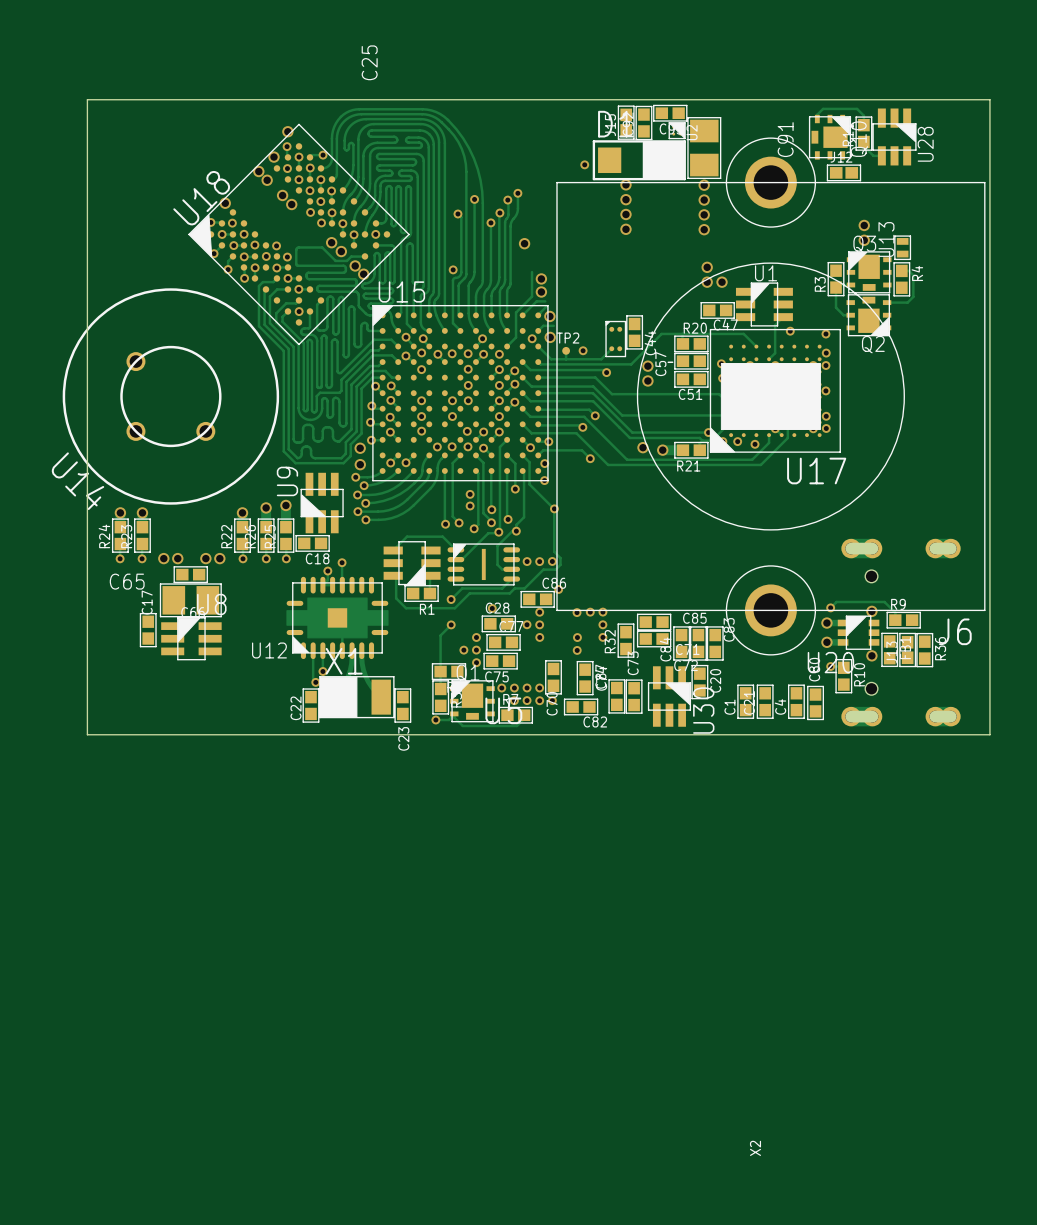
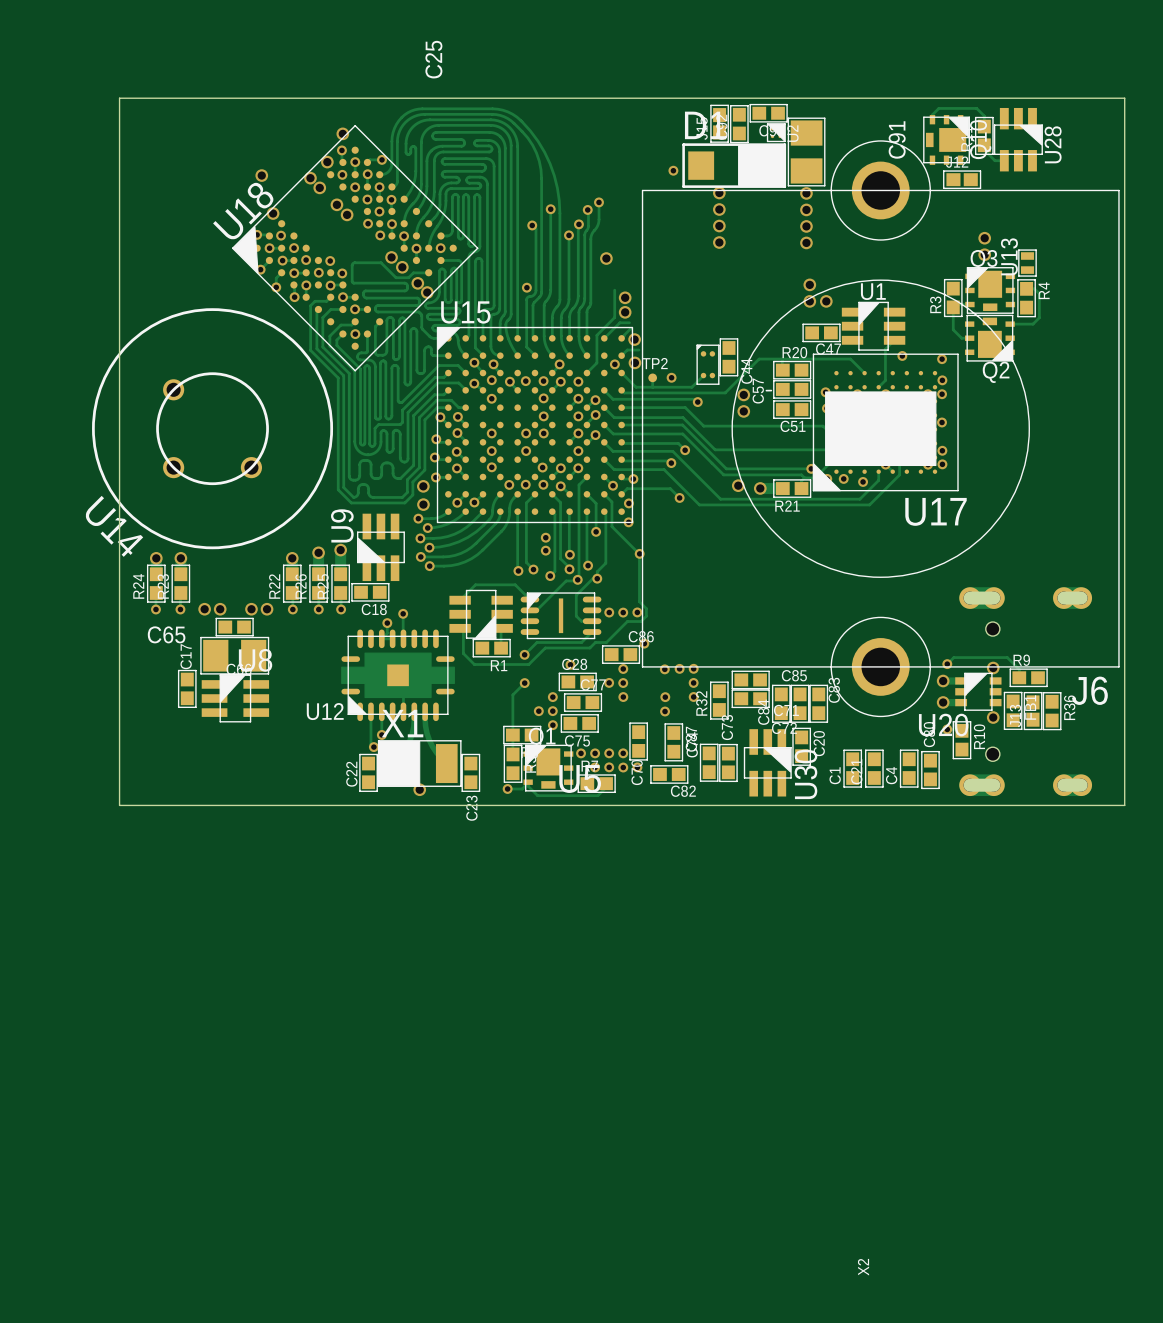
via: none -> (261, 175)
via: none -> (419, 789)

